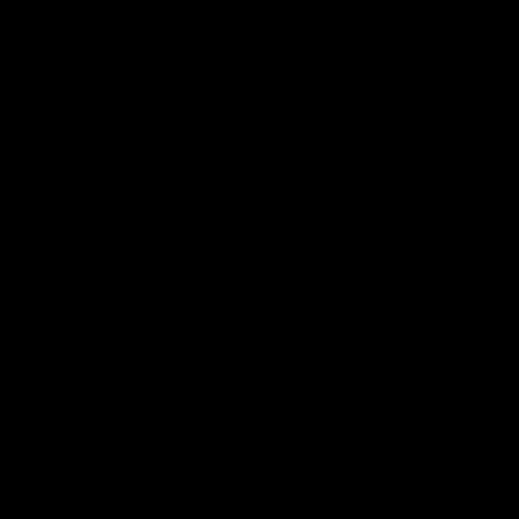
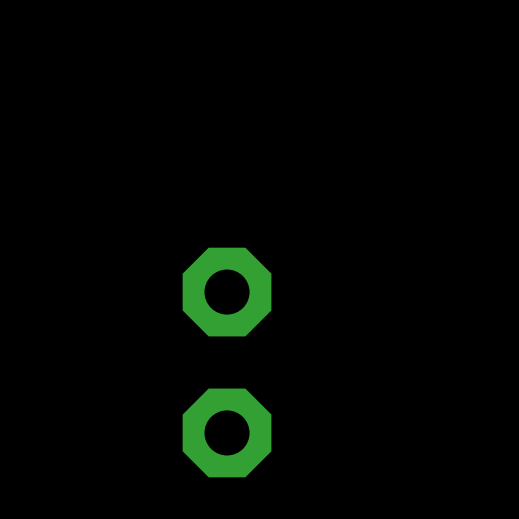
part: none -> (227, 292)
part: none -> (227, 432)

